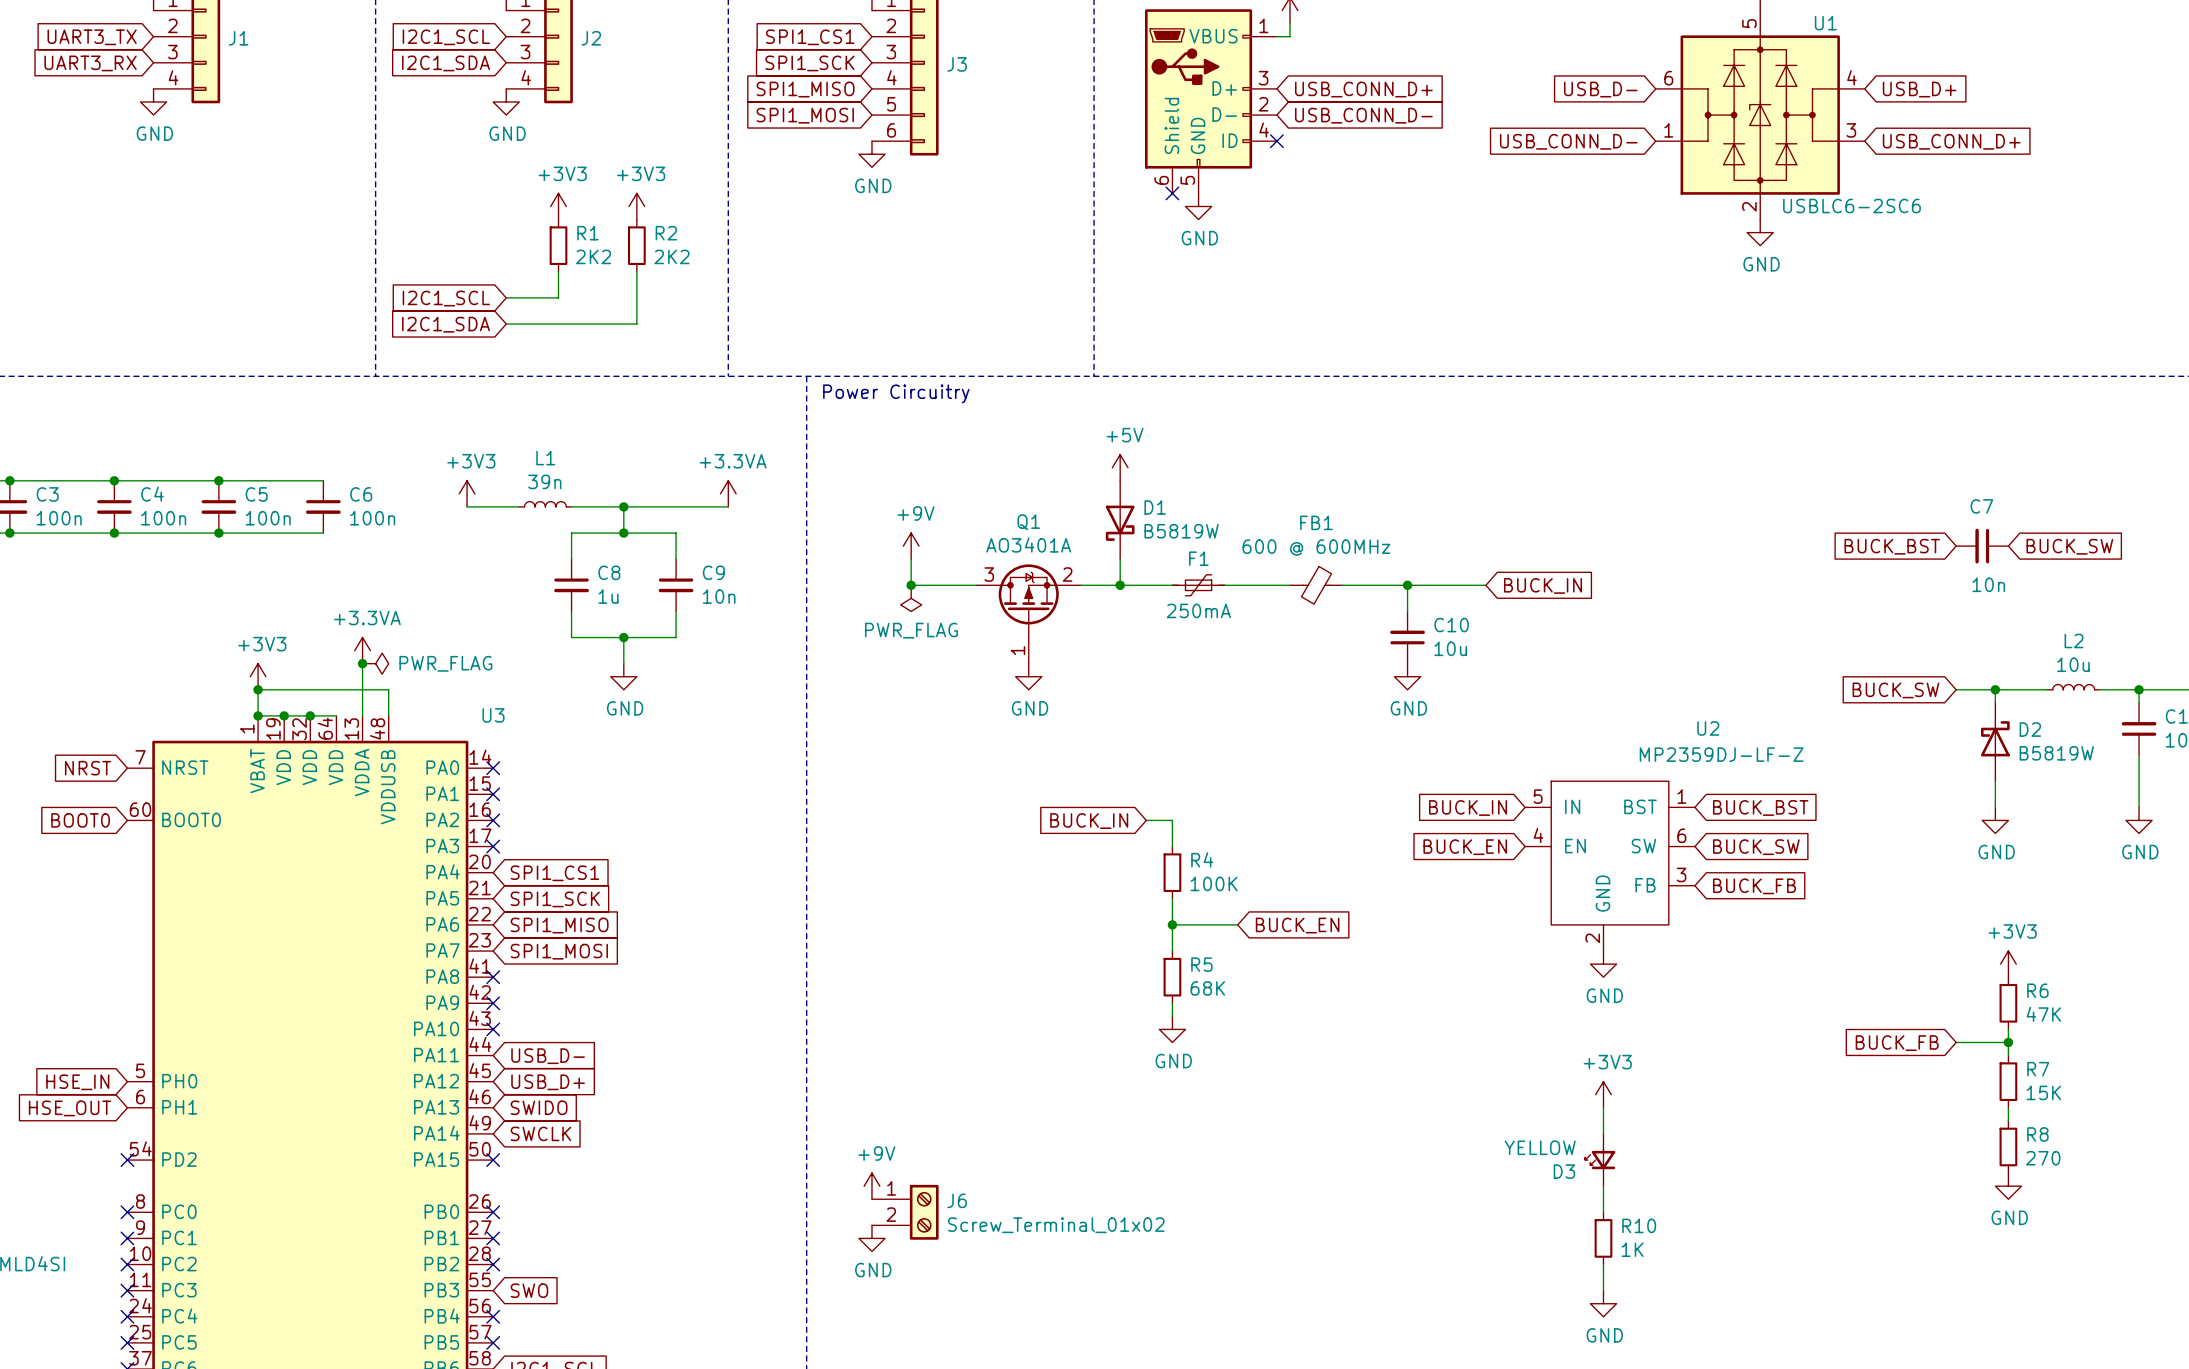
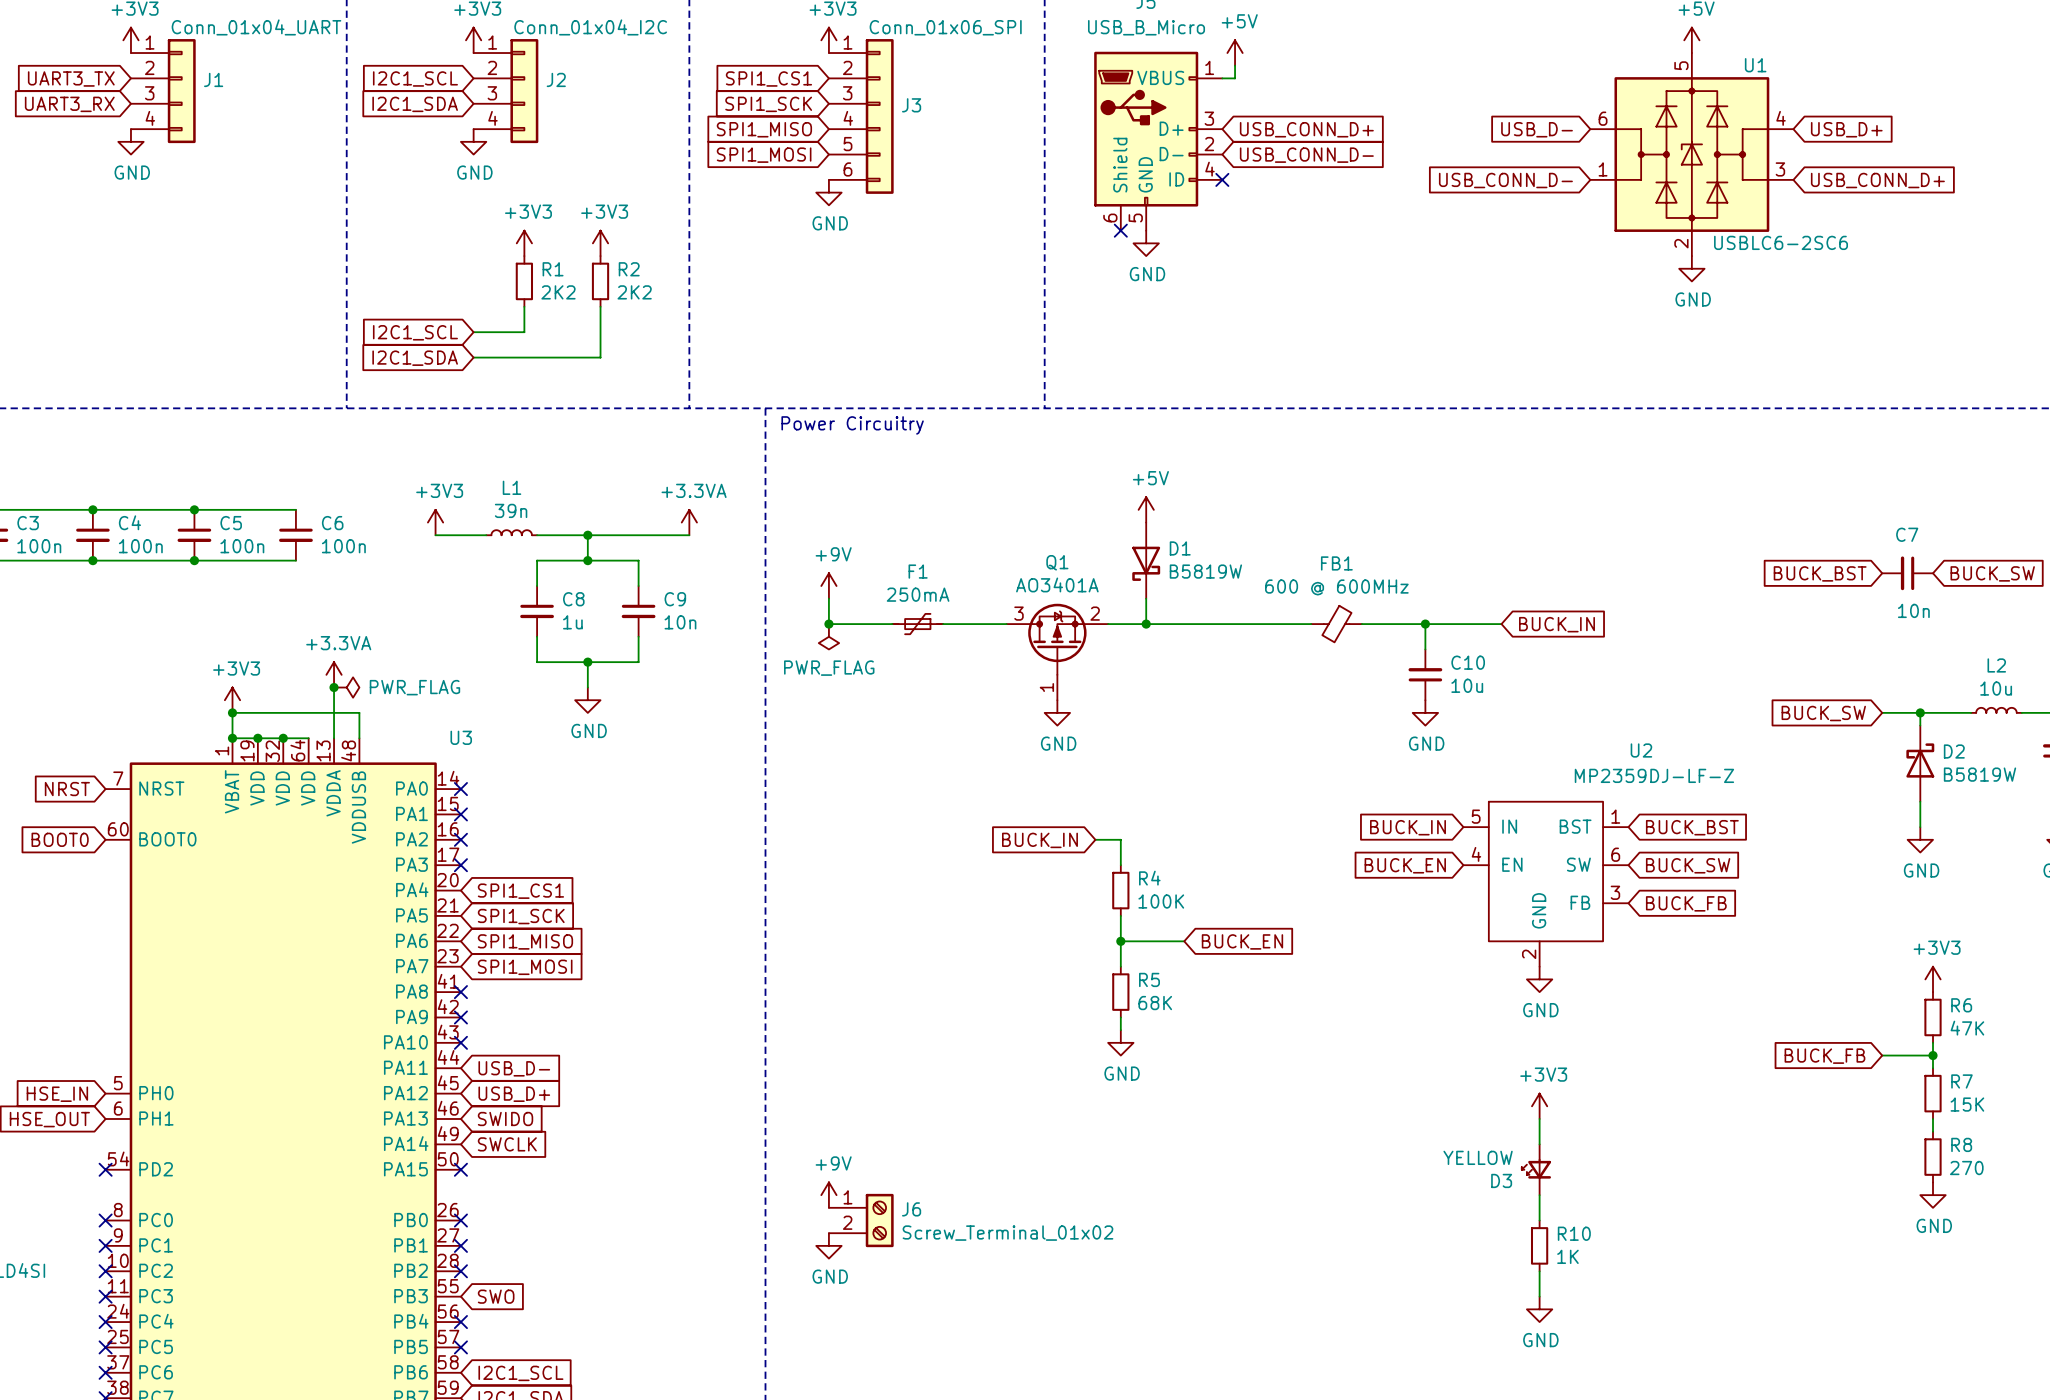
power symbol position: +5V (1120, 467) -> +5V (1146, 509)
D1 position: (1120, 519) -> (1146, 560)
power symbol position: +9V (911, 546) -> +9V (828, 586)
F1 name position: F1 (1198, 558) -> F1 (918, 571)
wire: (911, 559) (911, 585) (976, 585) -> (828, 598) (828, 624) (892, 624)
wire: (1120, 559) (1120, 585) -> (1146, 598) (1146, 624)
junction position: (911, 585) -> (828, 624)
wire: (1080, 585) (1172, 585) -> none
junction: (1120, 585) -> none
F1 position: (1198, 585) -> (917, 624)
wire: (1224, 585) (1289, 585) -> (943, 624) (1006, 624)
FB1 position: (1316, 585) -> (1336, 624)
wire: (1342, 585) (1485, 585) -> (1361, 624) (1501, 624)
wire: (1407, 585) (1407, 611) -> (1425, 624) (1425, 649)
junction: (1407, 585) -> none
global label position: BUCK_IN (1543, 585) -> BUCK_IN (1557, 624)
power symbol position: PWR_FLAG (911, 598) -> PWR_FLAG (828, 636)
wire: none -> (1108, 624) (1311, 624)
junction: none -> (1146, 624)
junction: none -> (1425, 624)
F1 value position: 250mA (1198, 610) -> 250mA (918, 594)
Q1 position: (1028, 614) -> (1057, 651)
C10 position: (1407, 637) -> (1425, 674)
power symbol position: GND (1028, 676) -> GND (1057, 712)
power symbol position: GND (1407, 676) -> GND (1425, 712)

